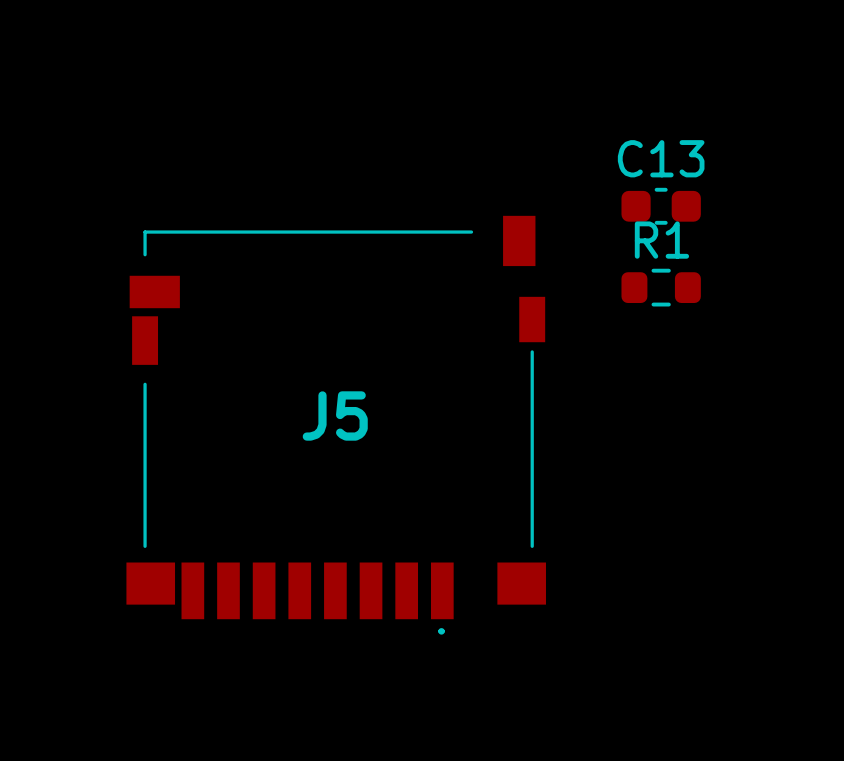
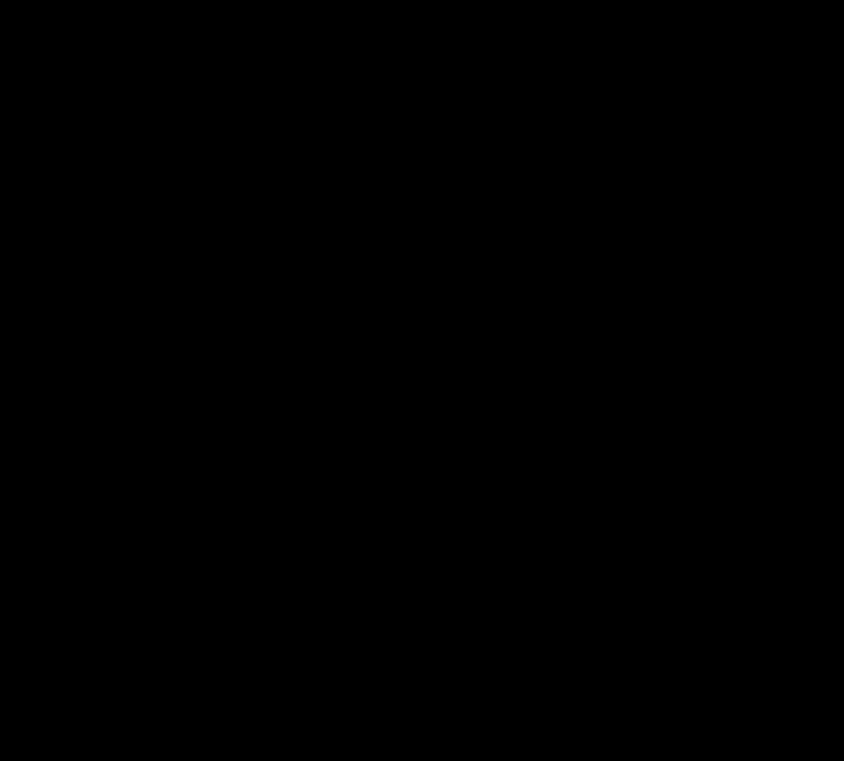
C13: (661, 206) -> none
R1: (661, 287) -> none
J5: (336, 425) -> none

